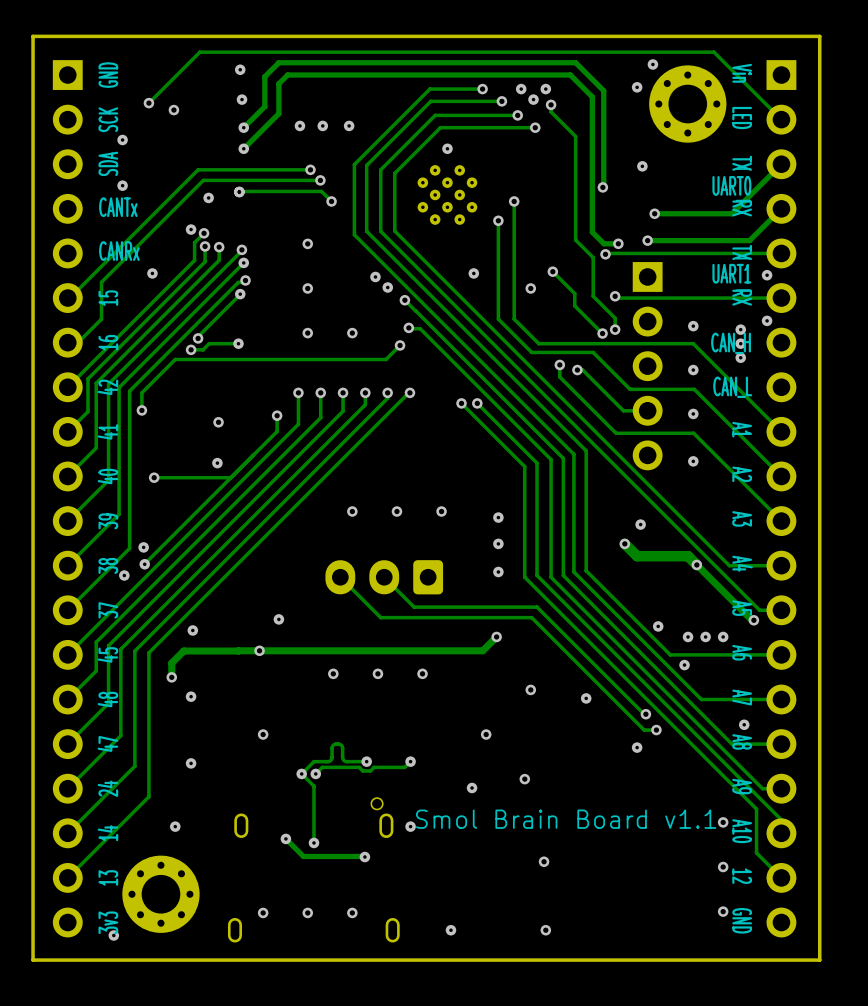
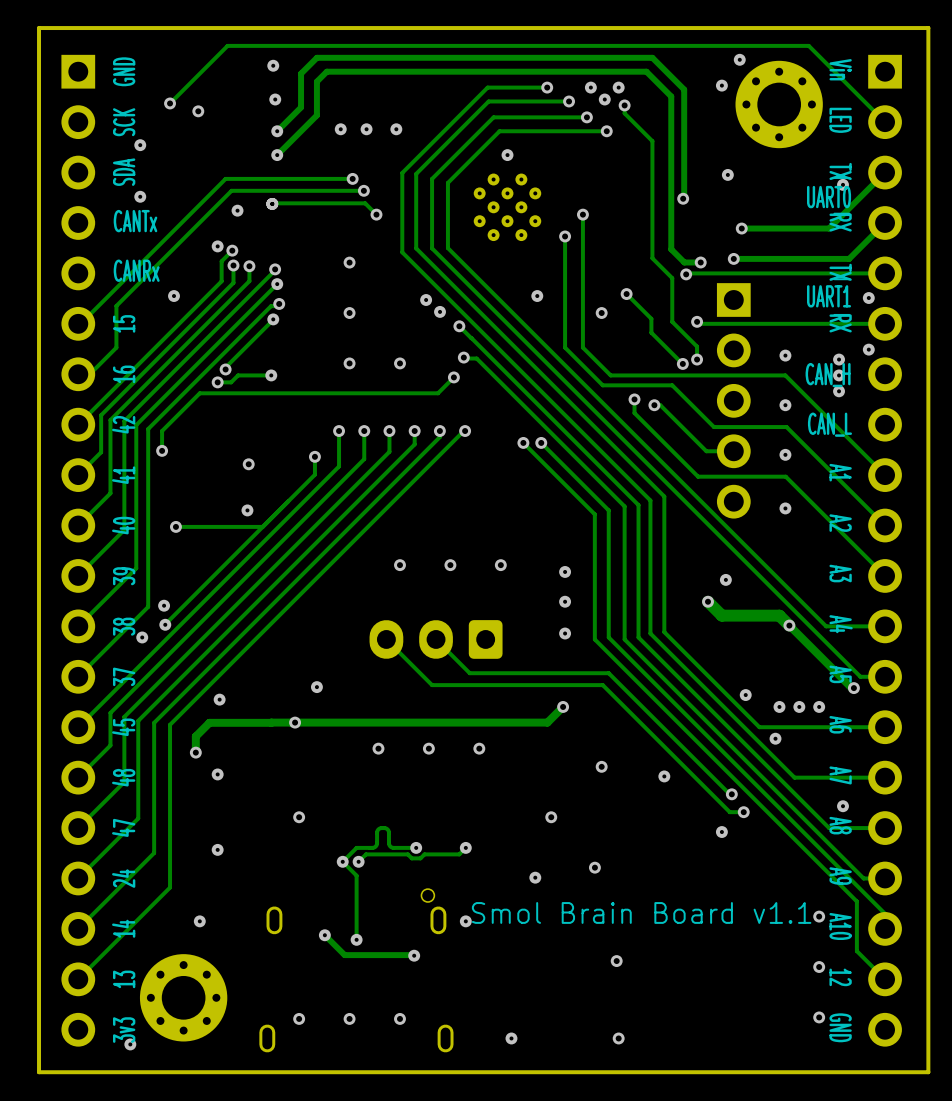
via: none -> (843, 184)

